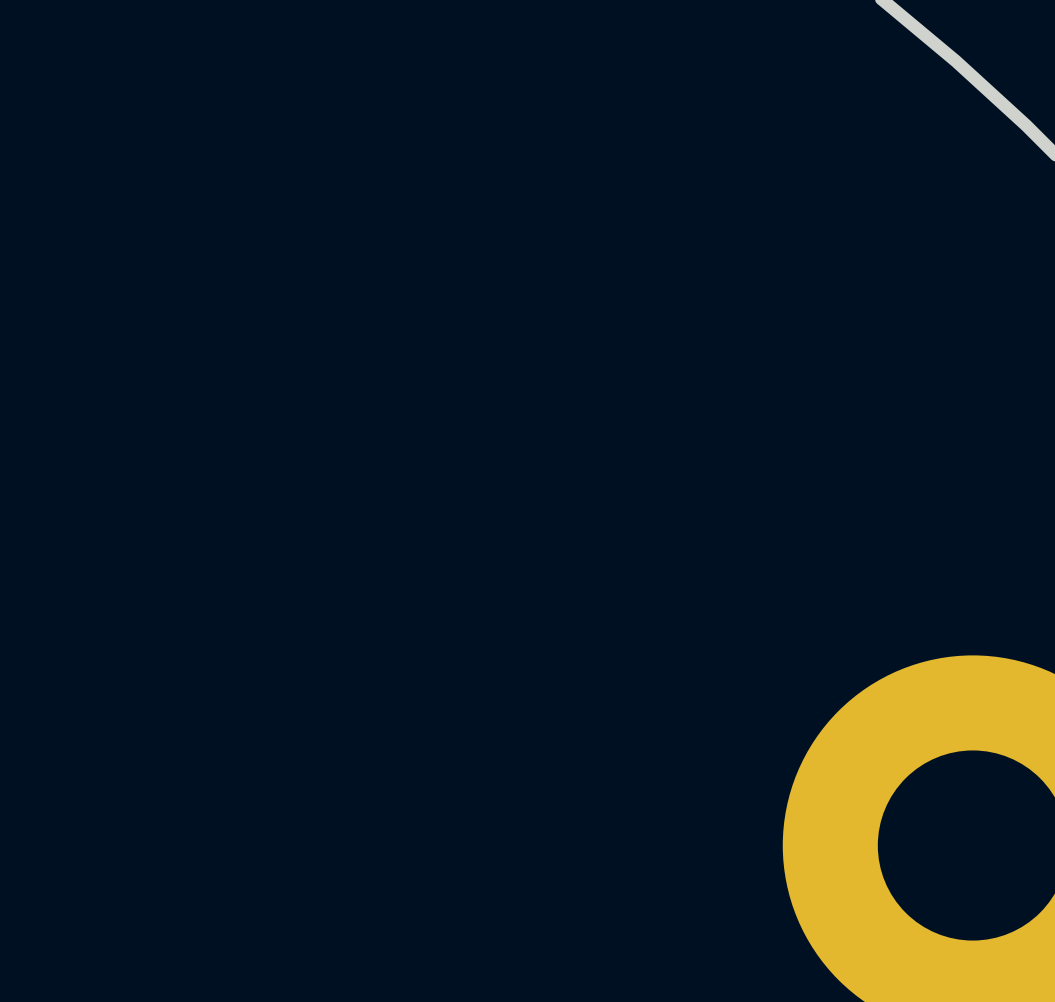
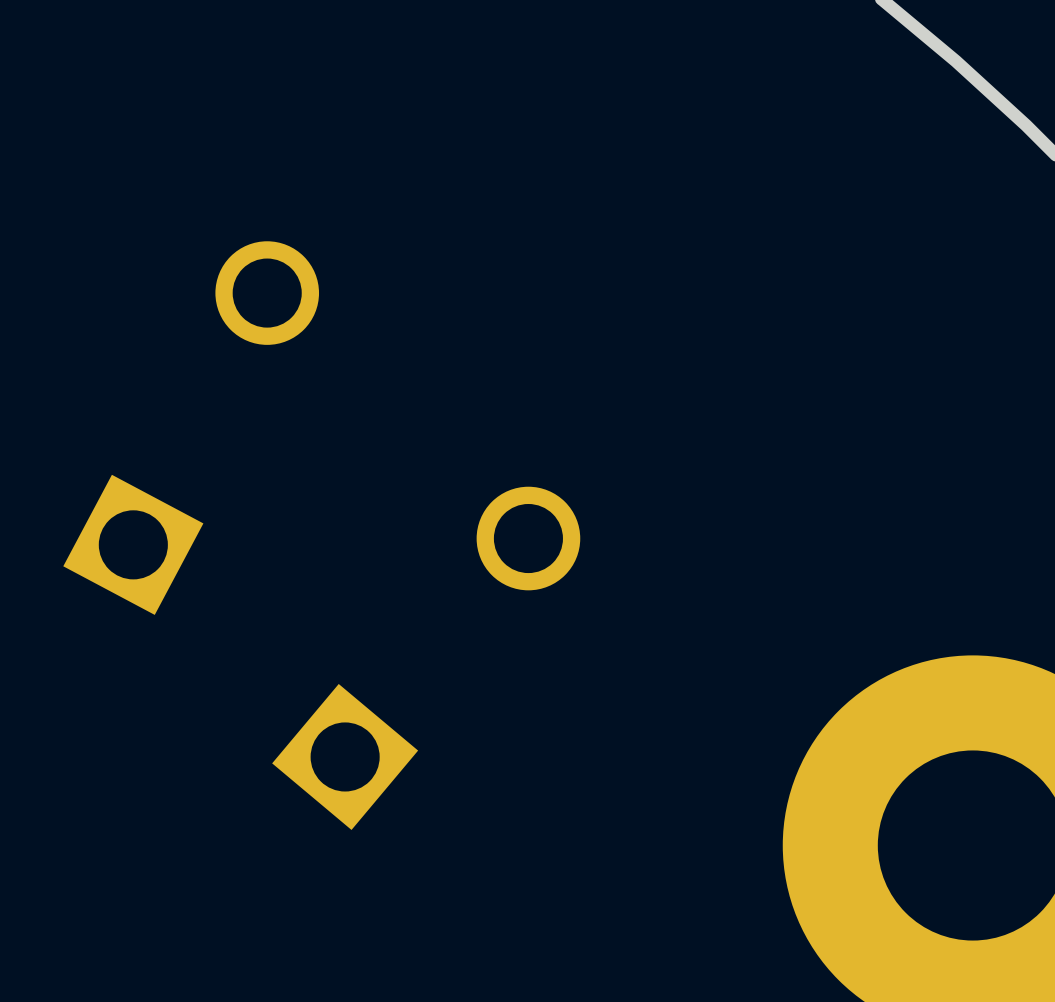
part: none -> (191, 428)
part: none -> (426, 658)

